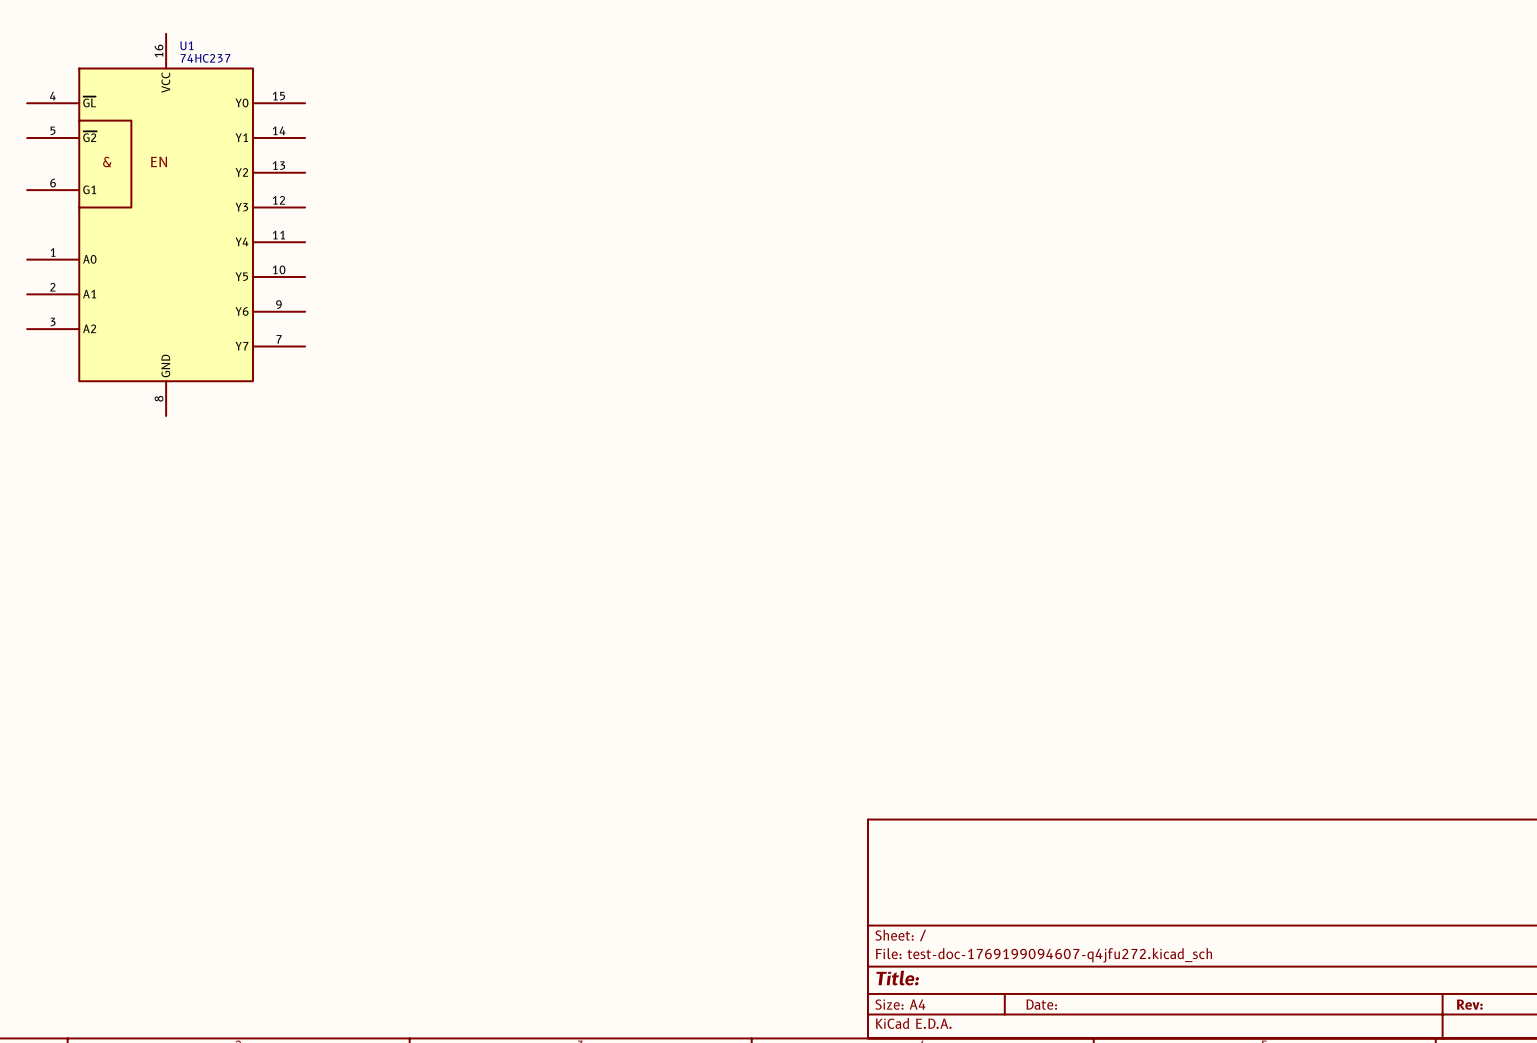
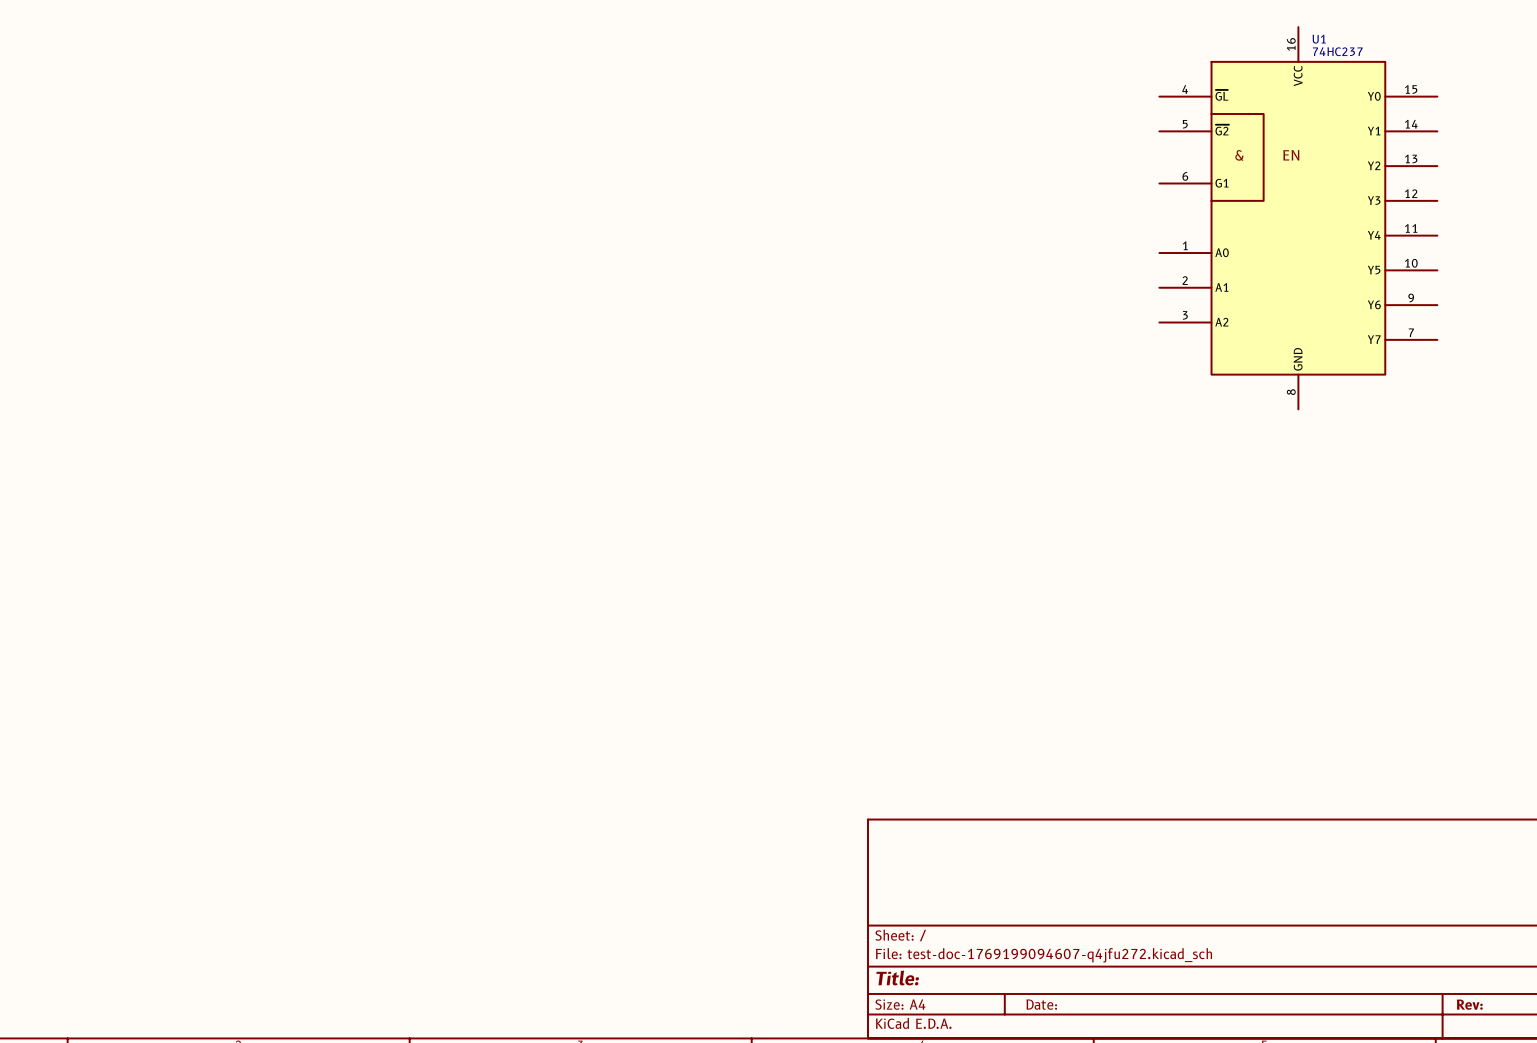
U1 position: (166, 224) -> (1298, 218)

